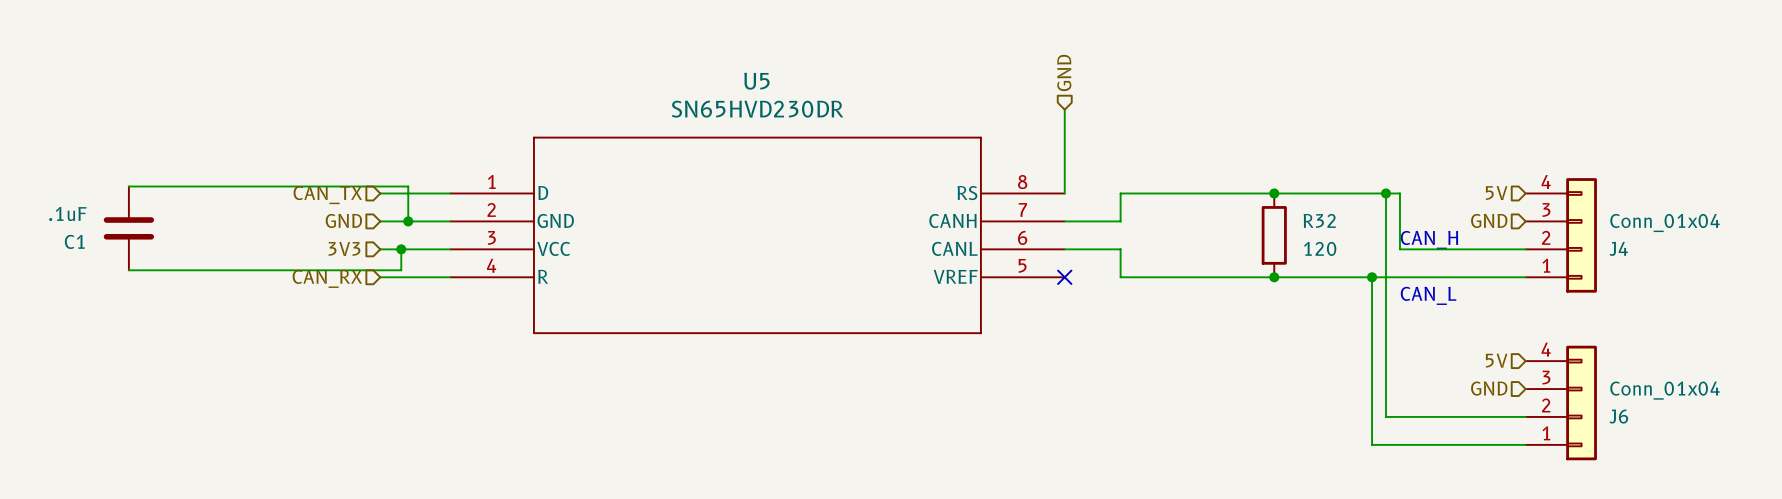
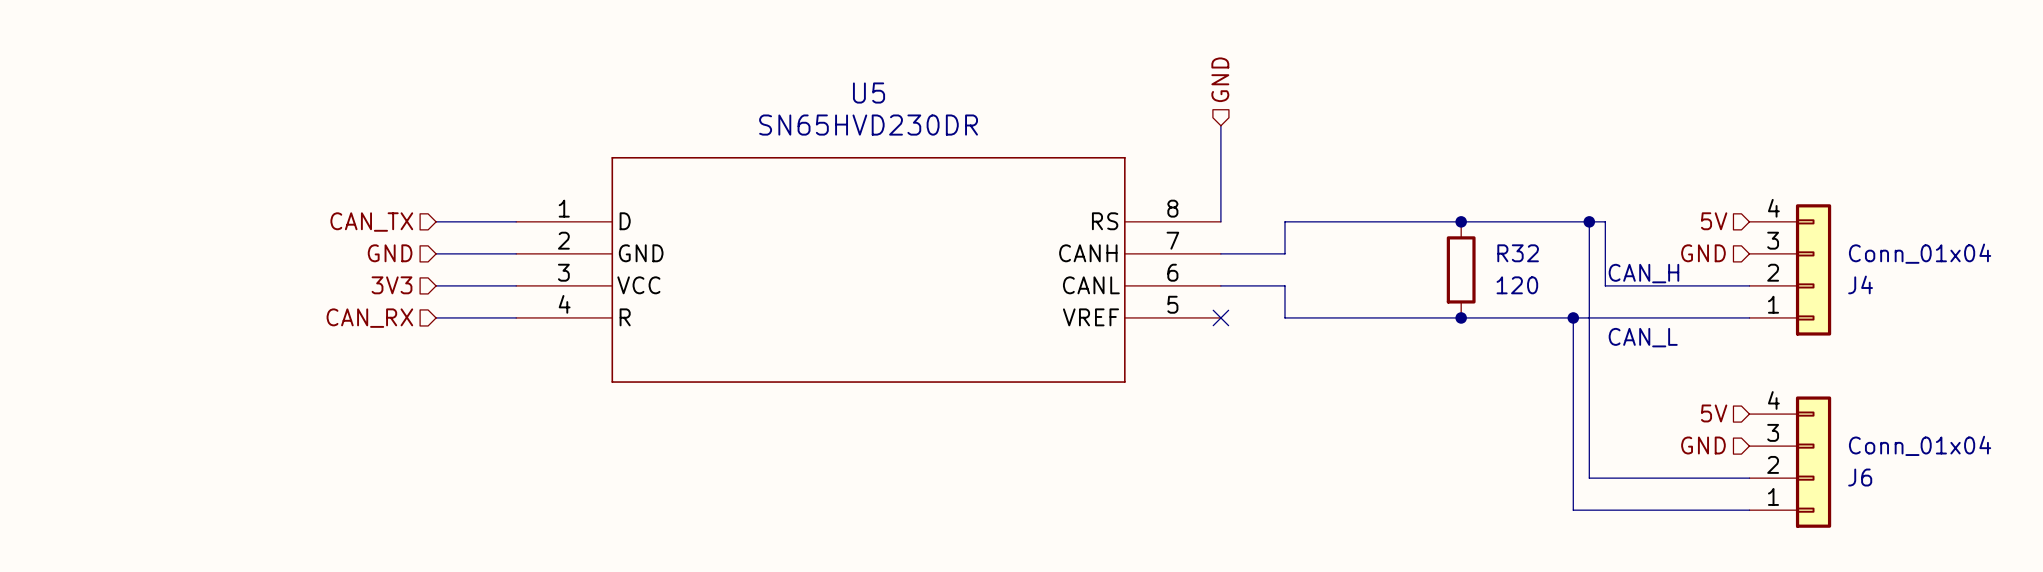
wire: (128, 186) (408, 186) (408, 221) -> none
junction: (408, 221) -> none
C1: .1uF (128, 228) -> none
wire: (401, 249) (401, 270) (128, 270) -> none
junction: (401, 249) -> none

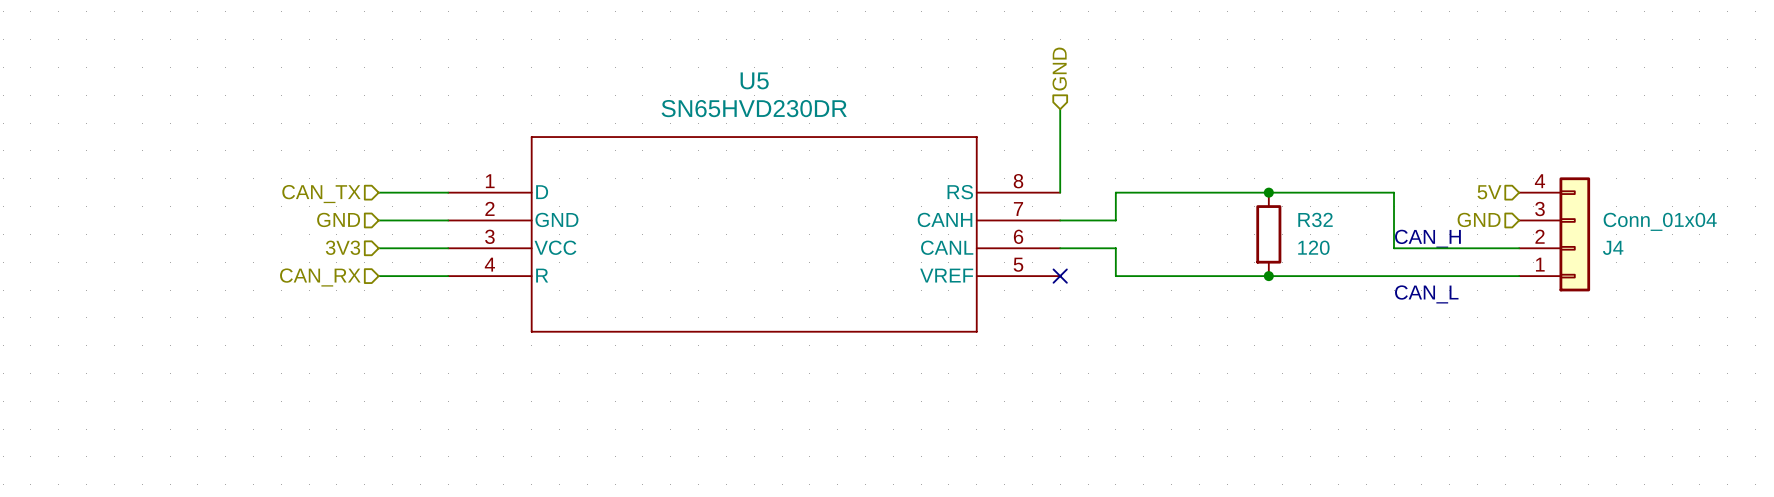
wire: (1589, 221) (1589, 478) (1749, 478) -> none
junction: (1589, 221) -> none
wire: (1573, 317) (1573, 510) (1749, 510) -> none
junction: (1573, 317) -> none
hierarchical label: 5V (1714, 413) -> none
hierarchical label: GND (1703, 445) -> none
J6: Conn_01x04 (1790, 462) -> none

